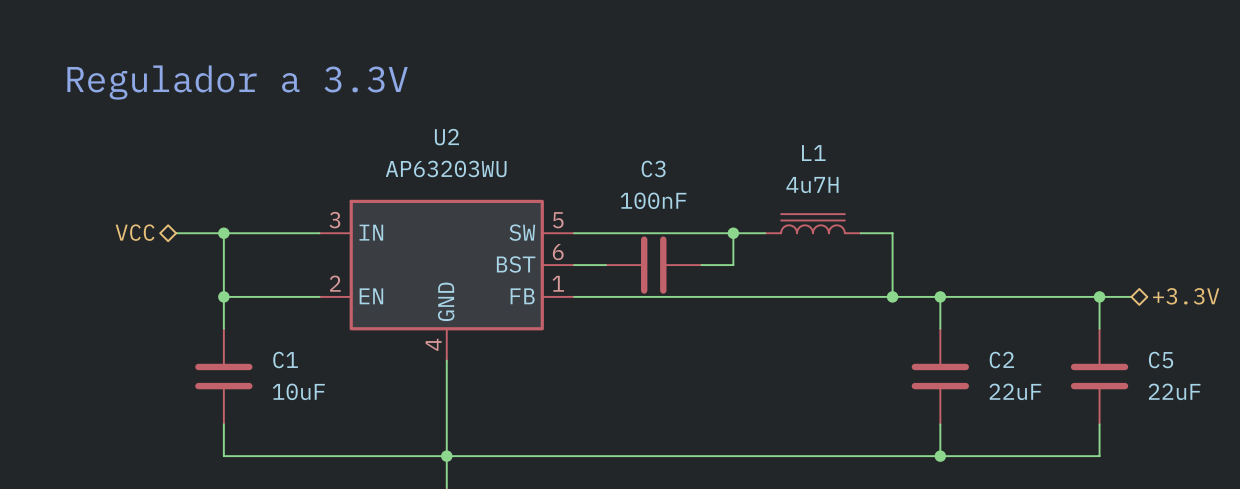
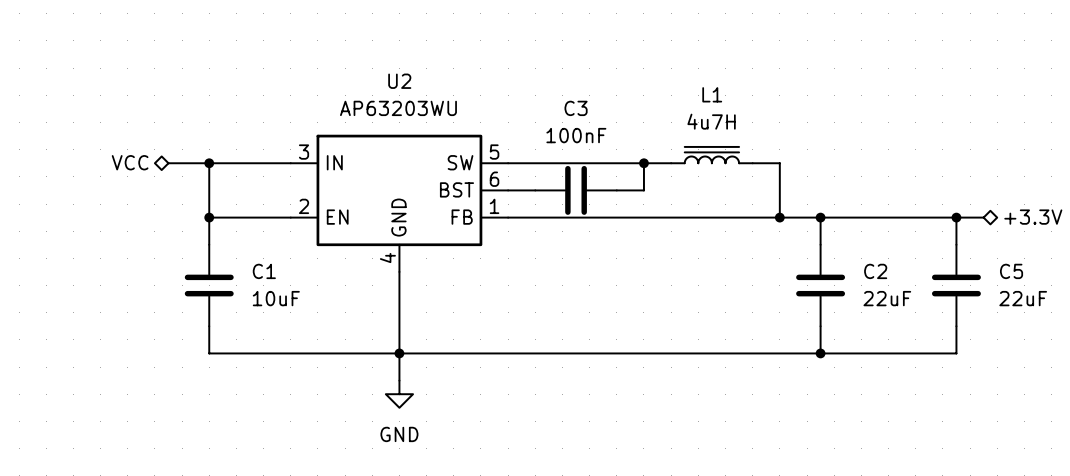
text: Regulador a 3.3V (237, 82) -> none

